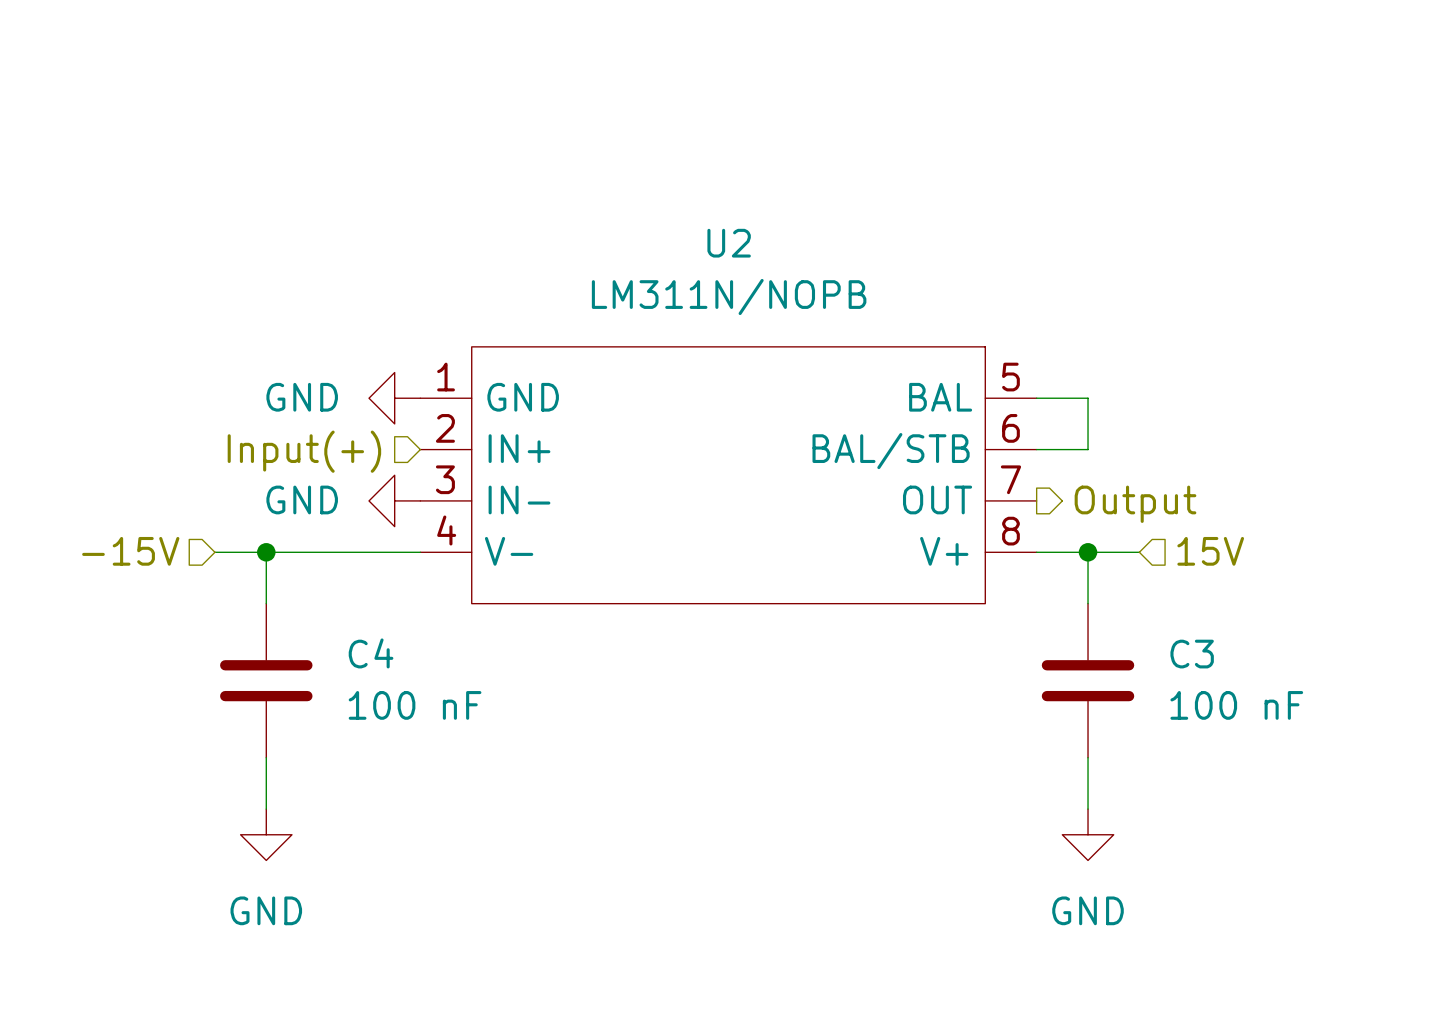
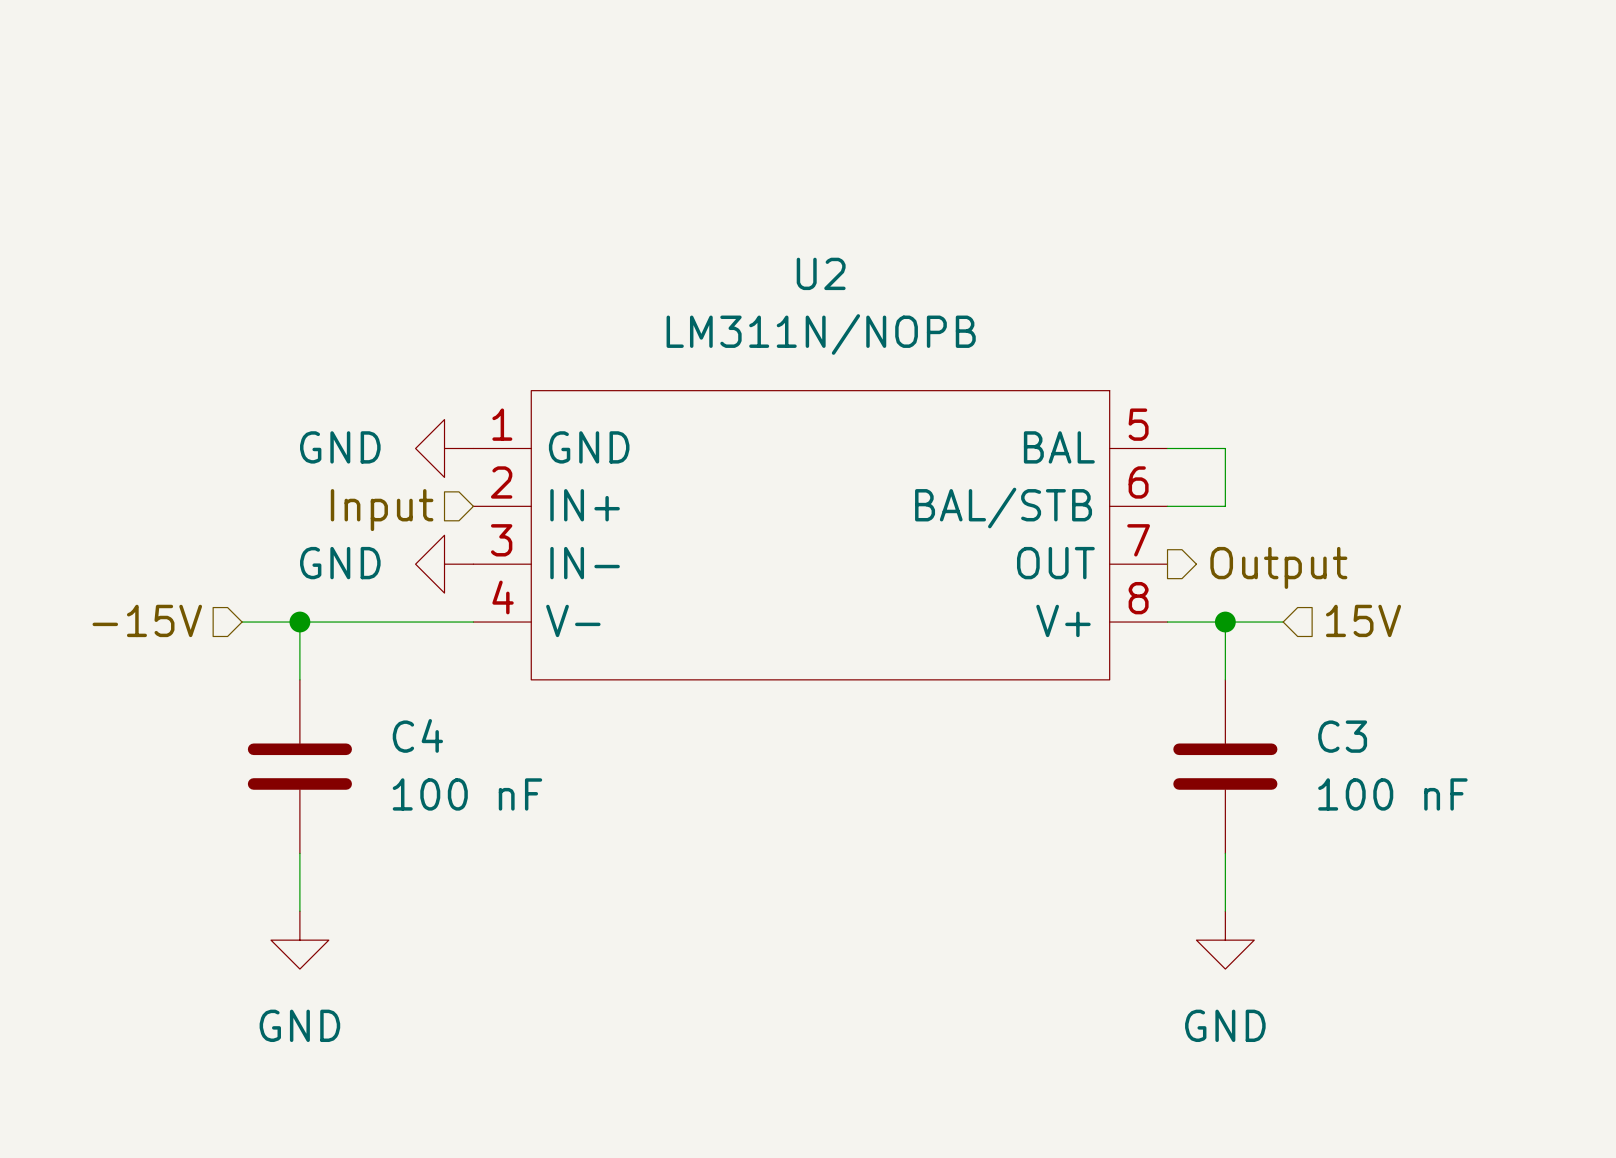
hierarchical label: Input(+) (304, 451) -> Input (382, 510)

